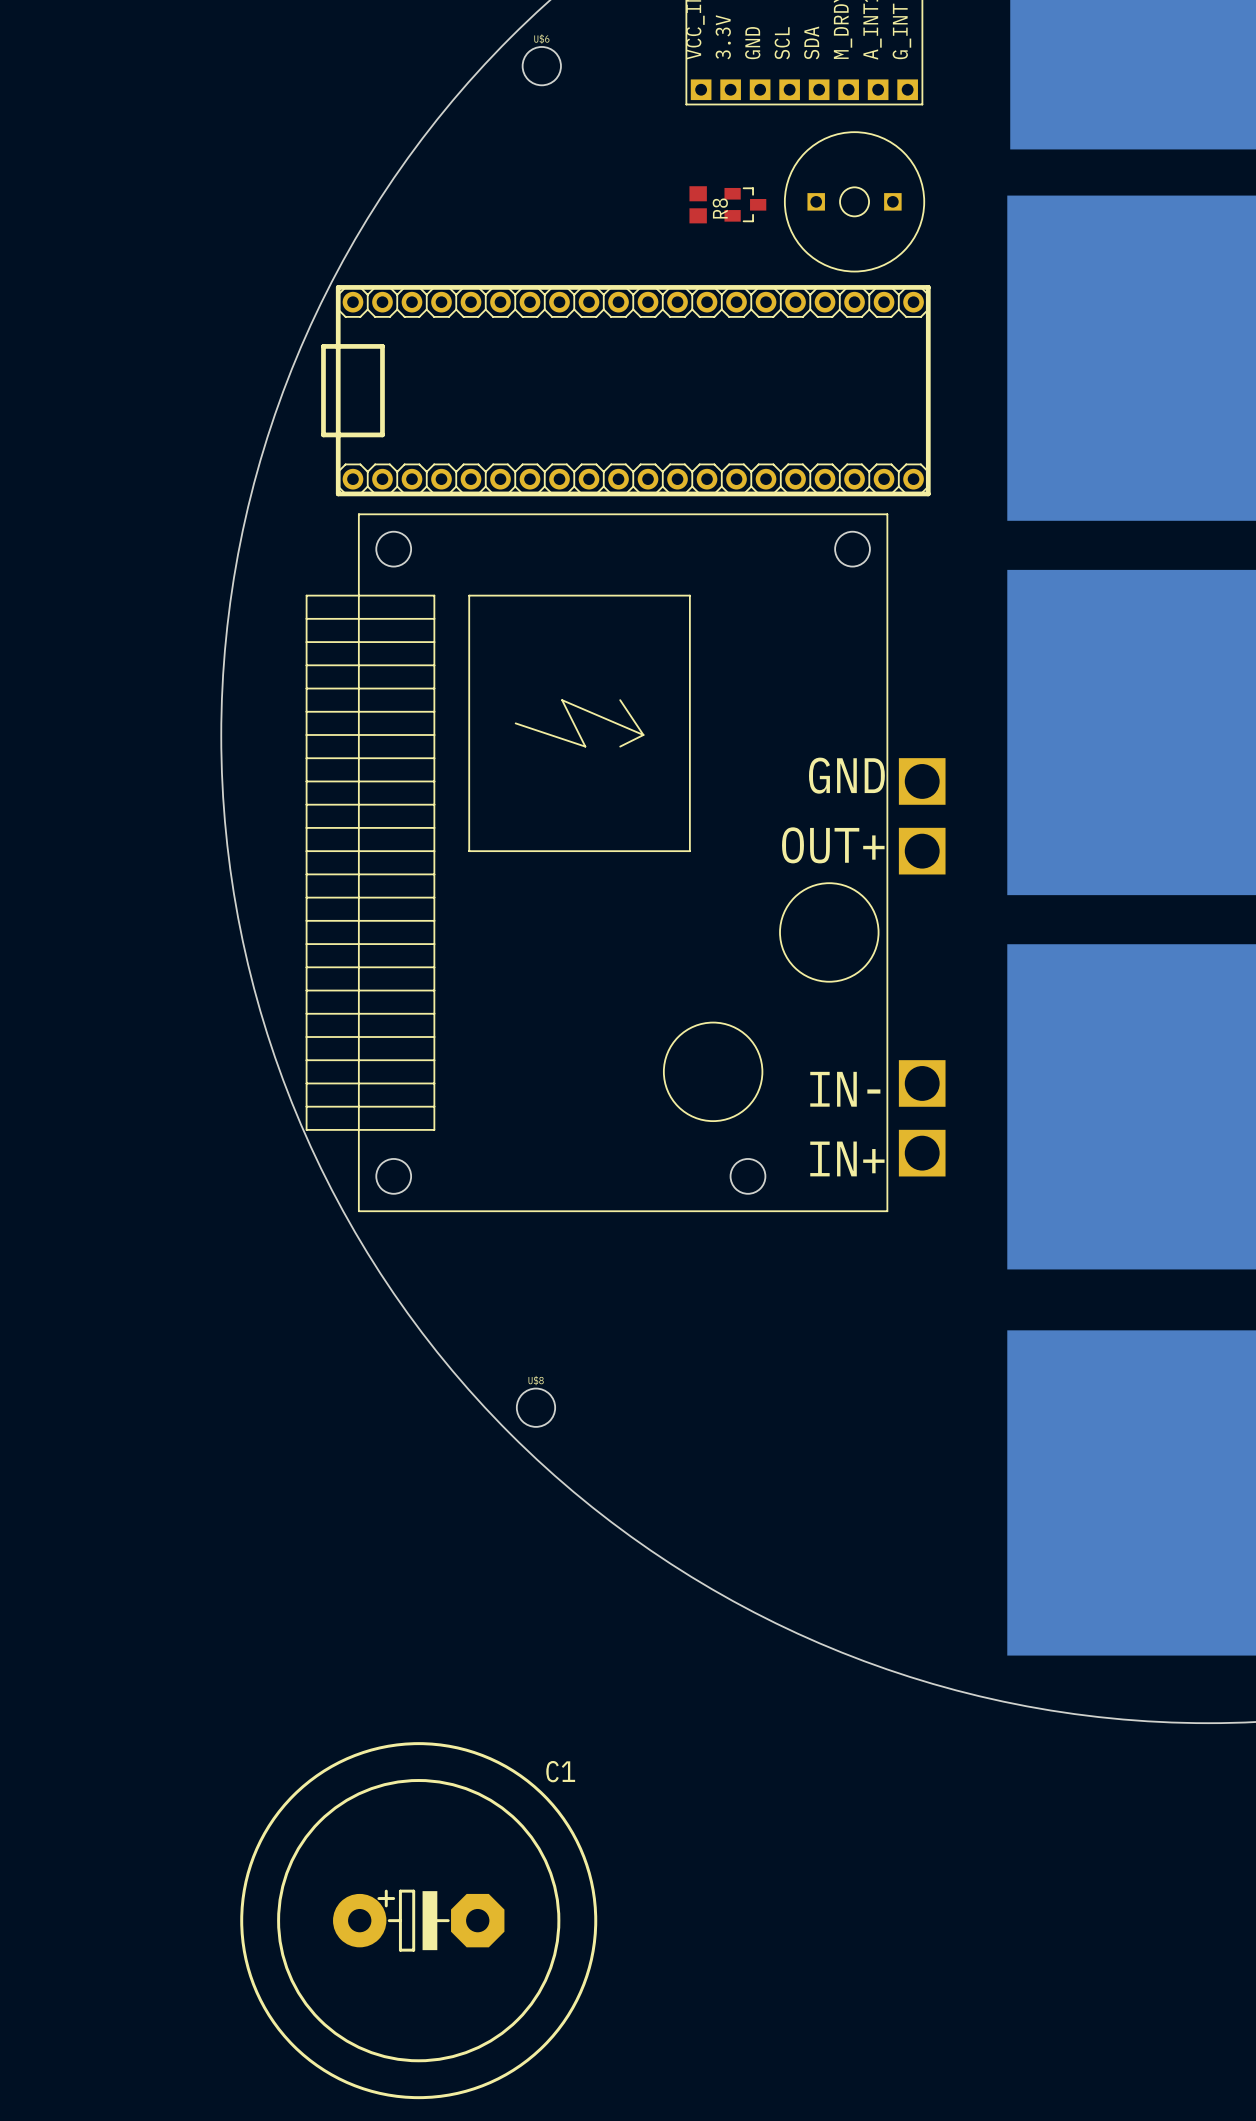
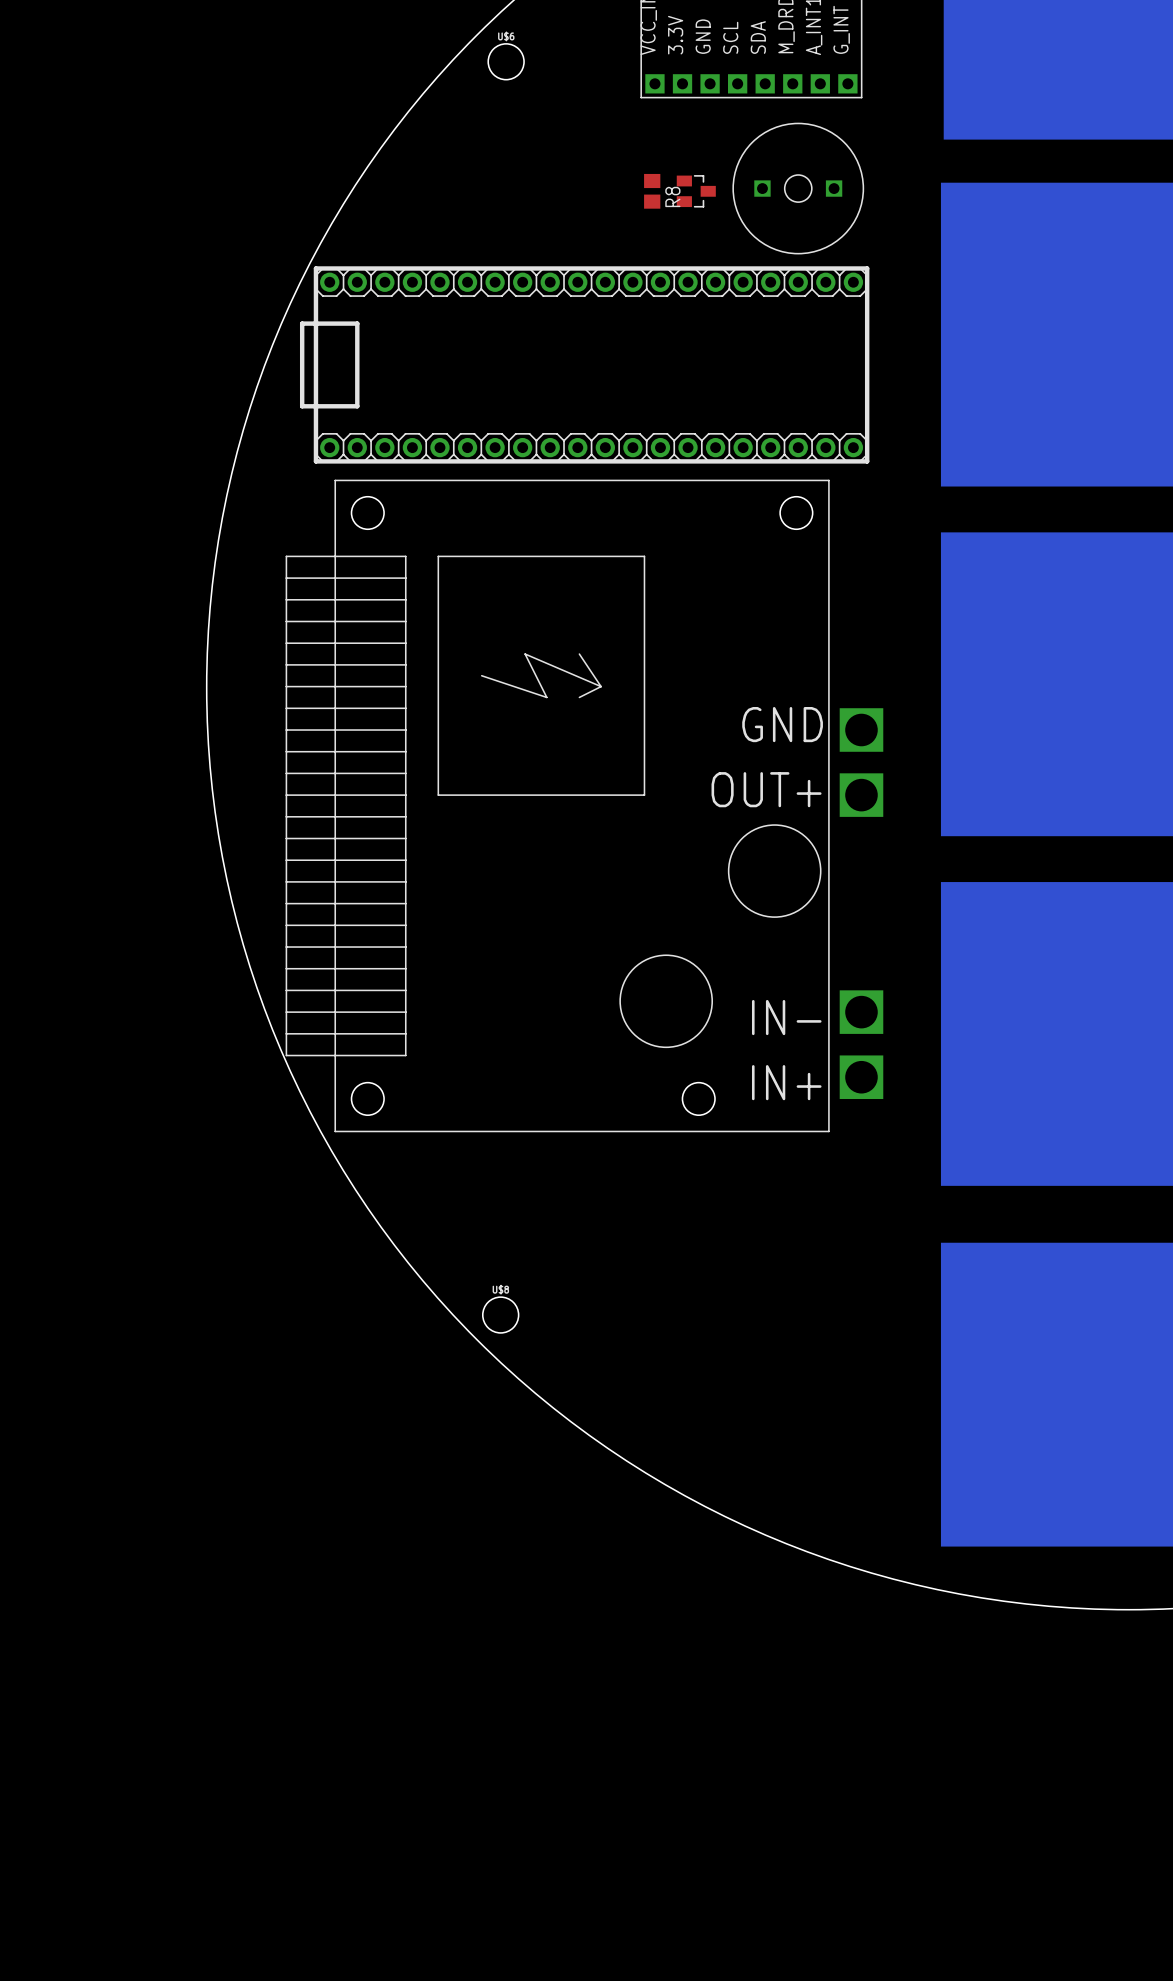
C1: (418, 1920) -> none

